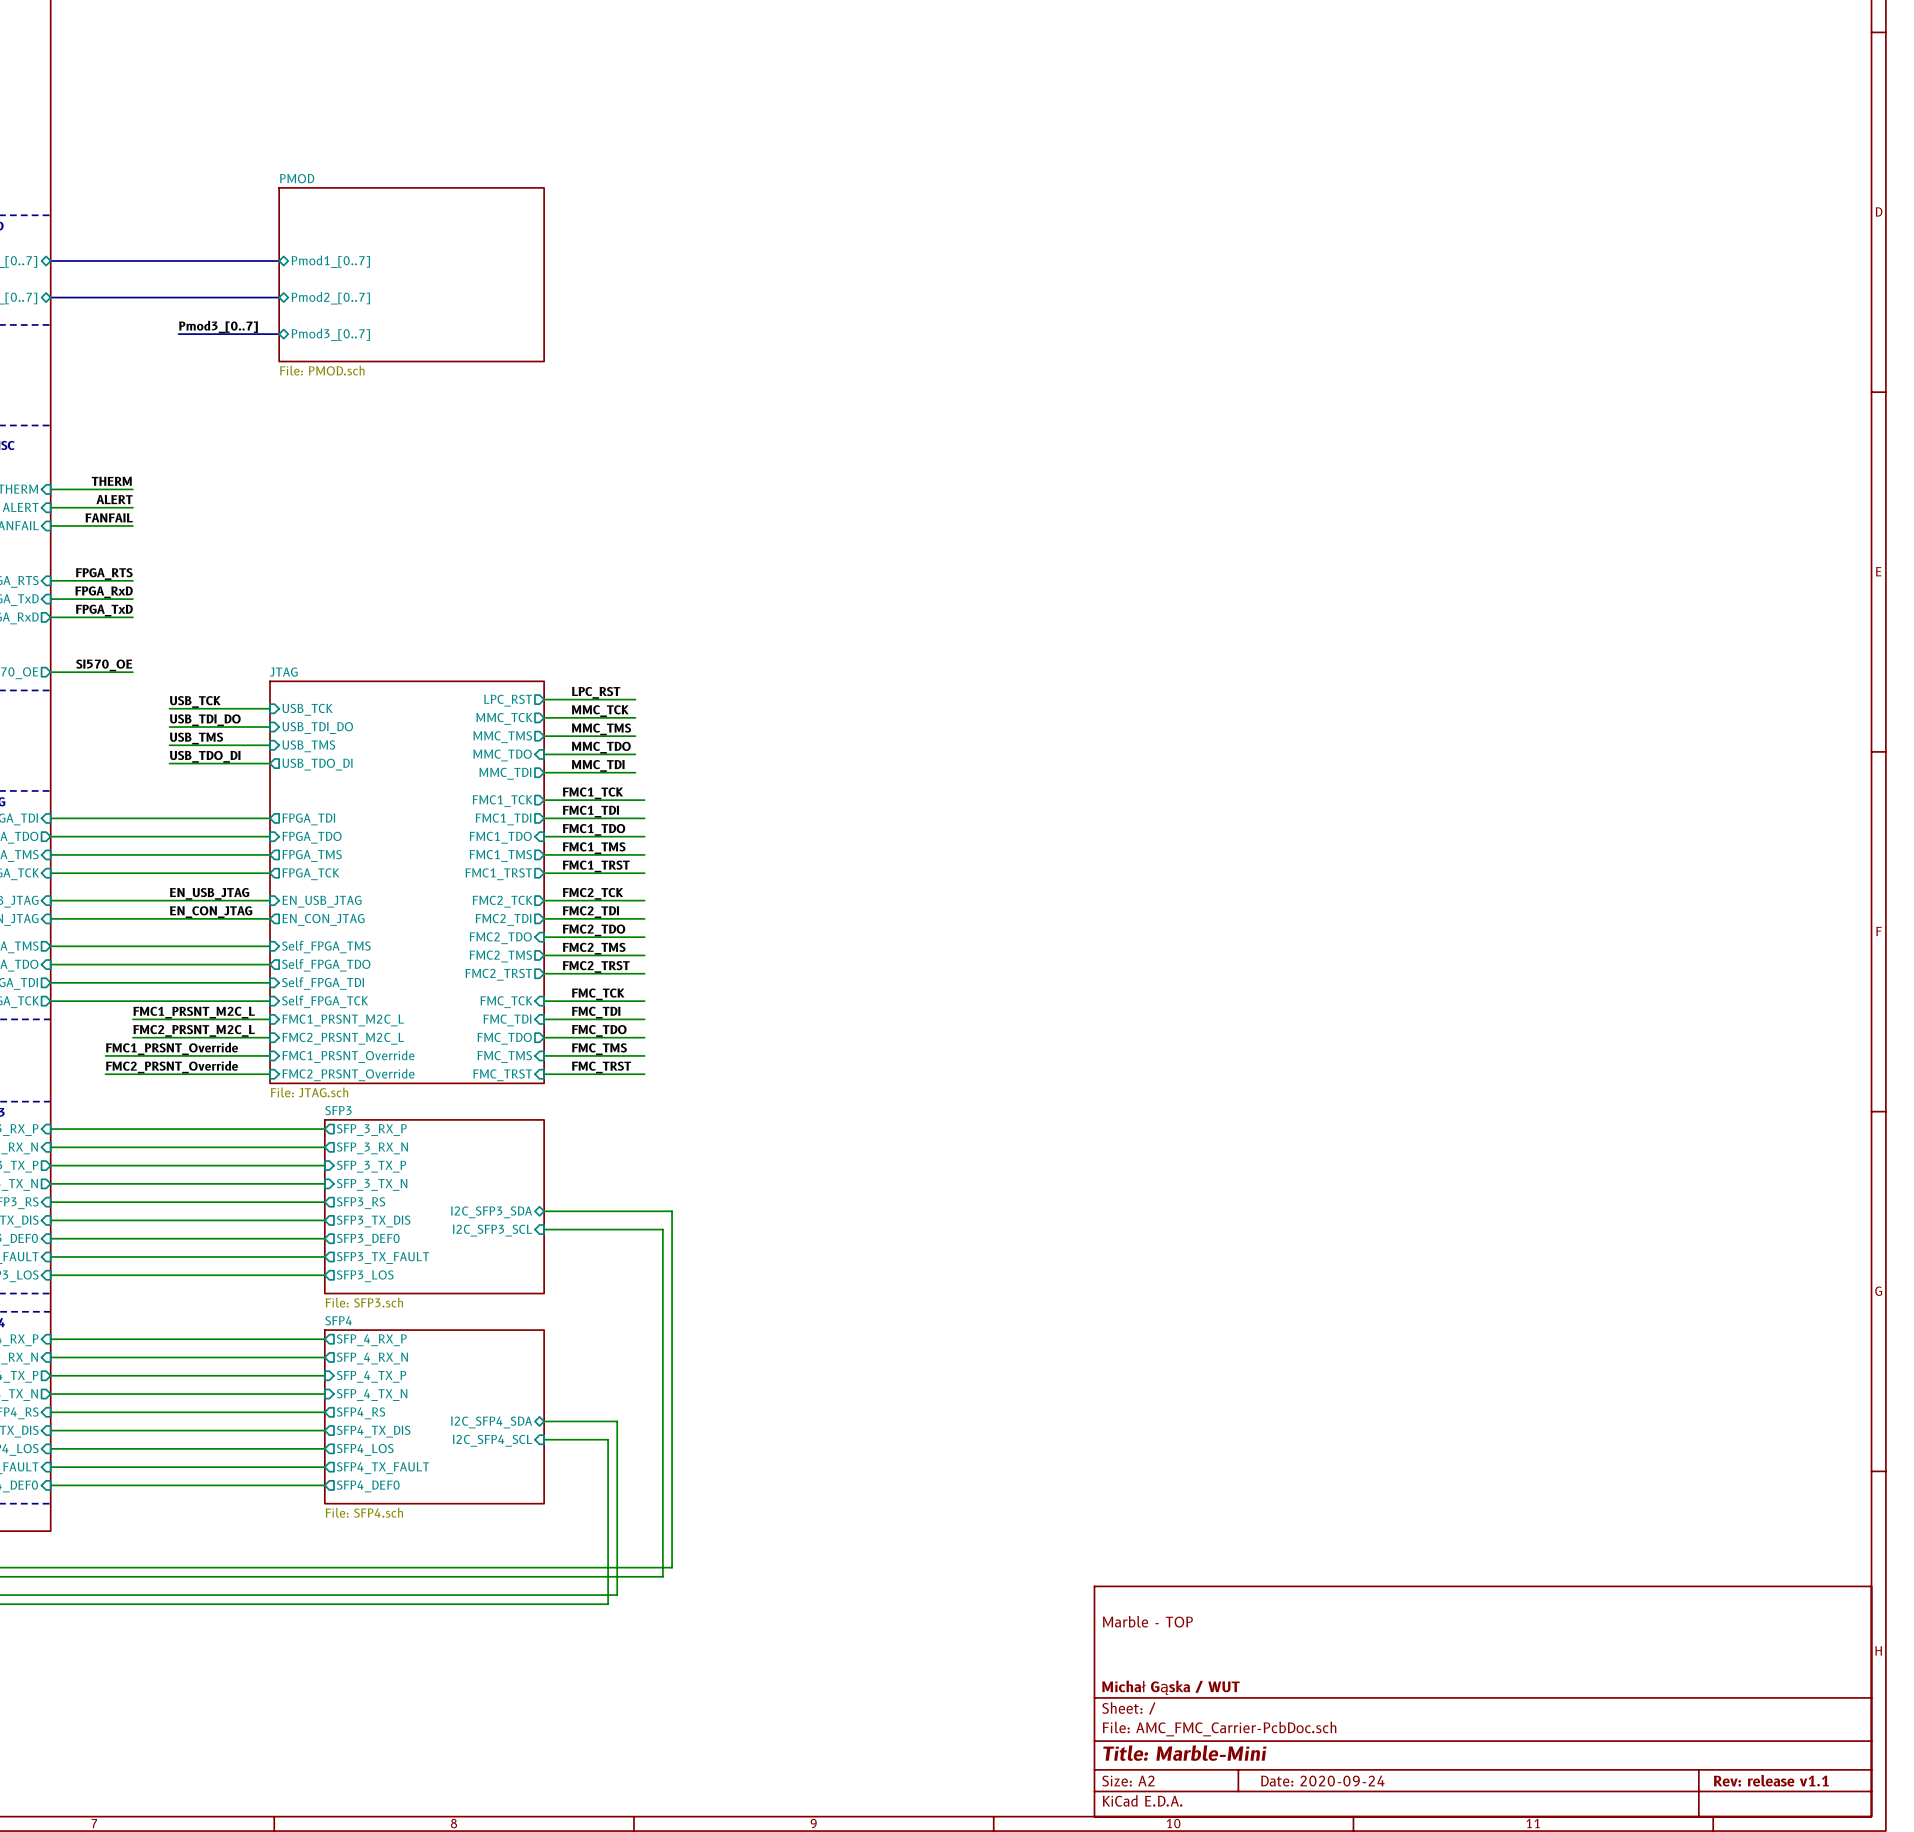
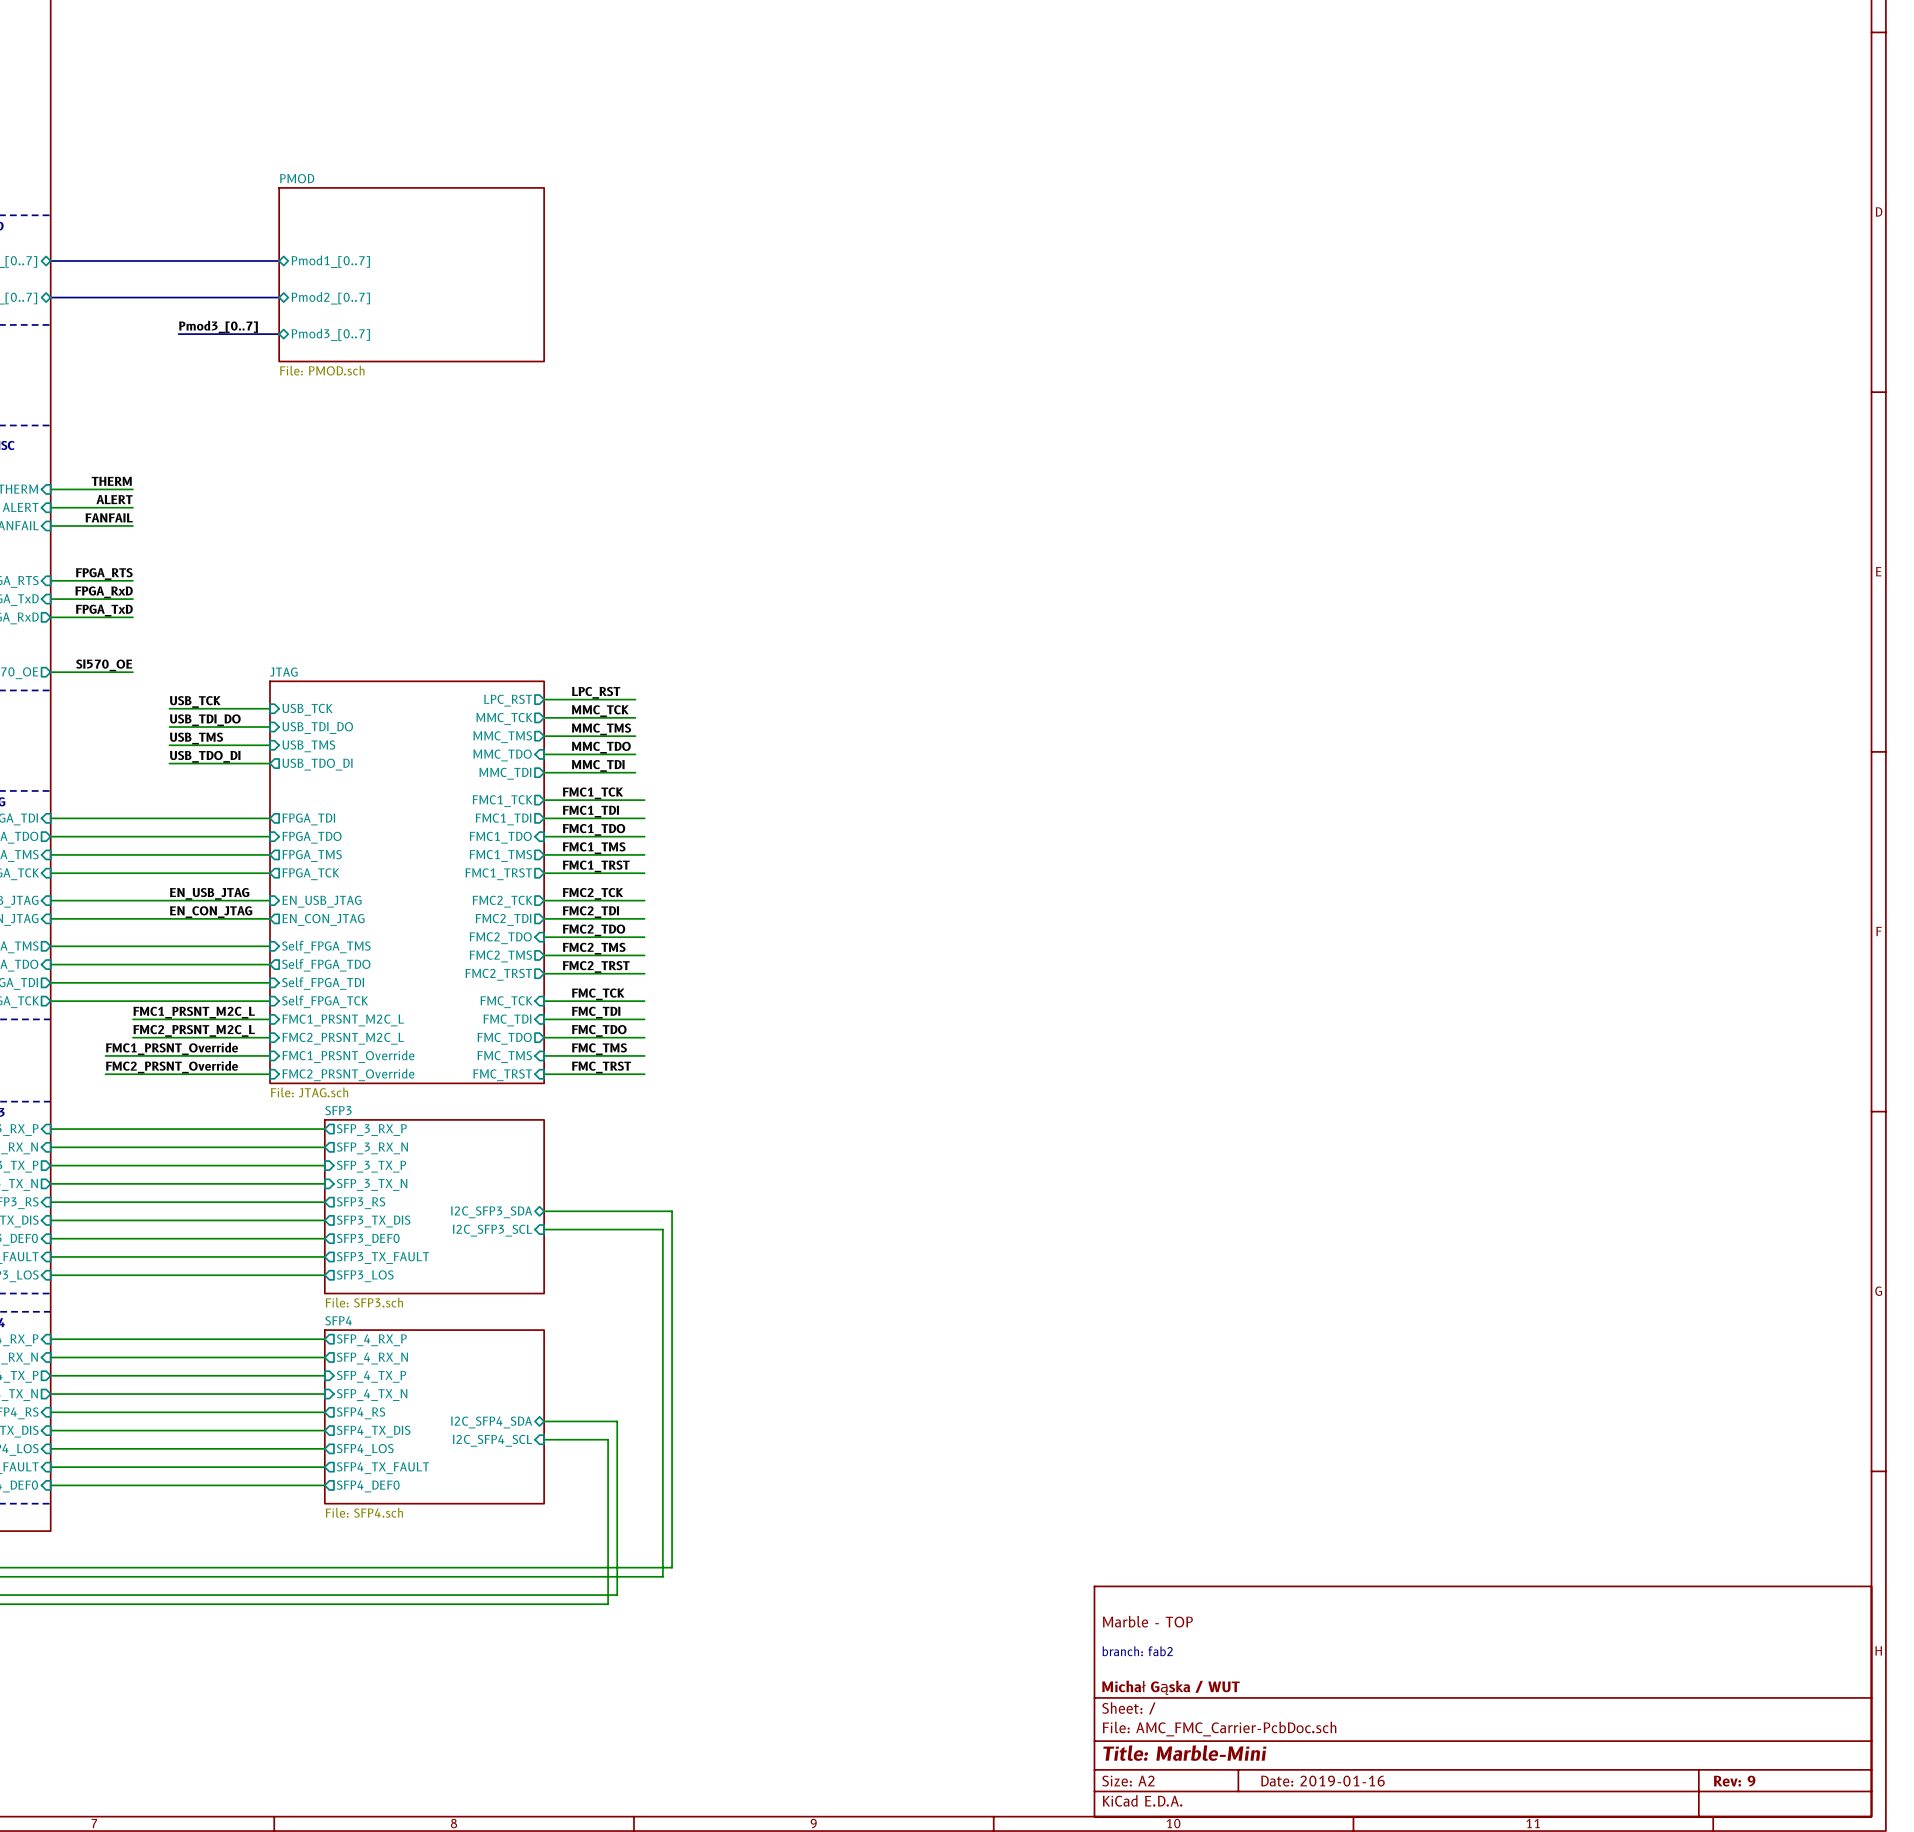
text: none -> branch: fab2 (1137, 1651)
title block: Rev: release v1.1 (1771, 1780) -> Rev: 9 (1734, 1781)
title block: Date: 2020-09-24 (1322, 1781) -> Date: 2019-01-16 (1322, 1781)

